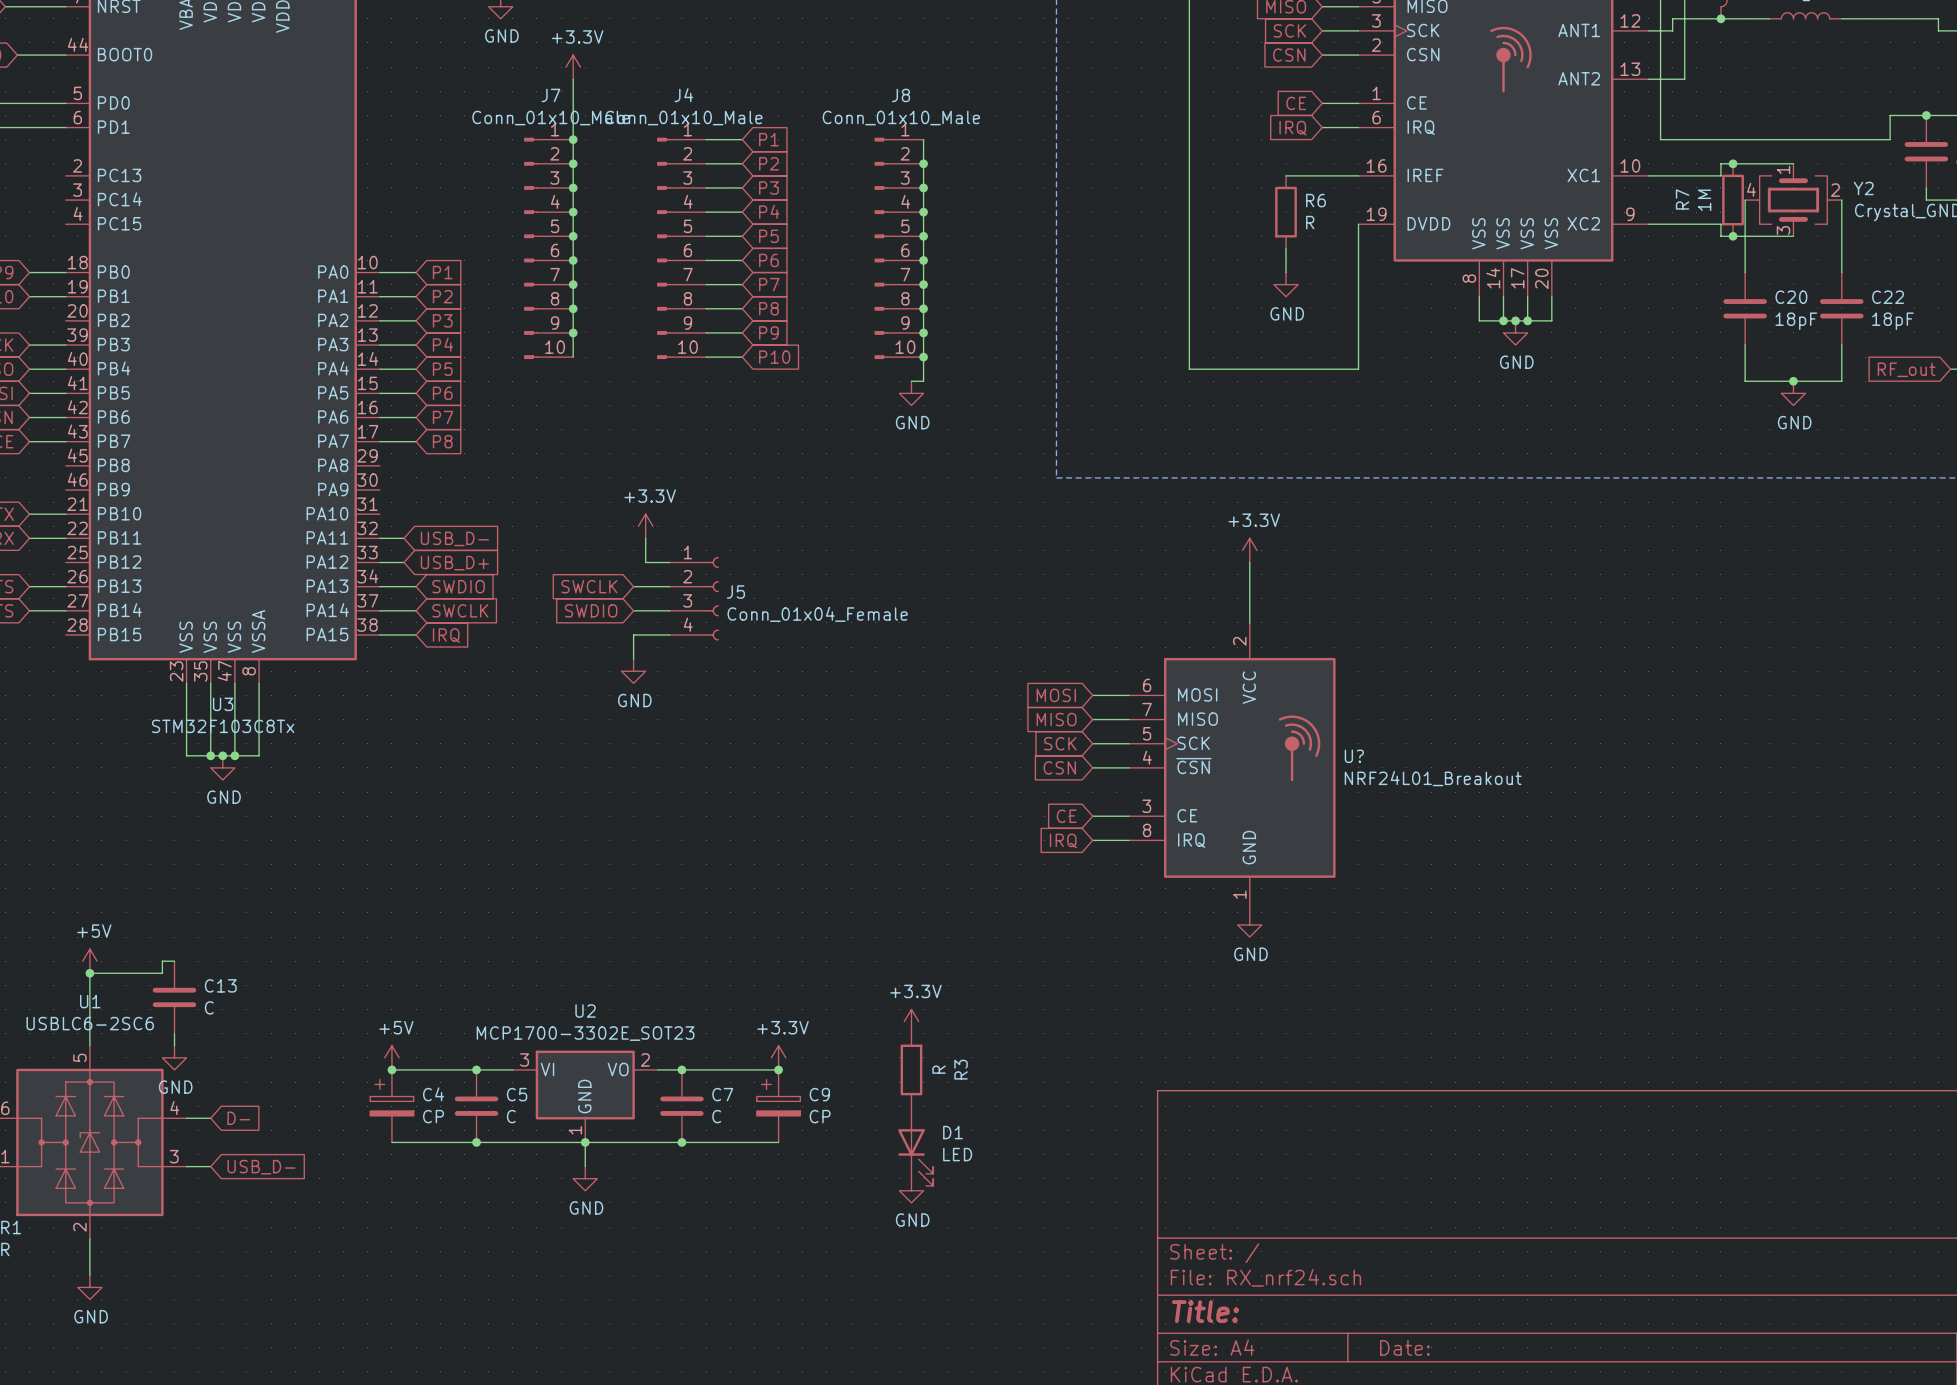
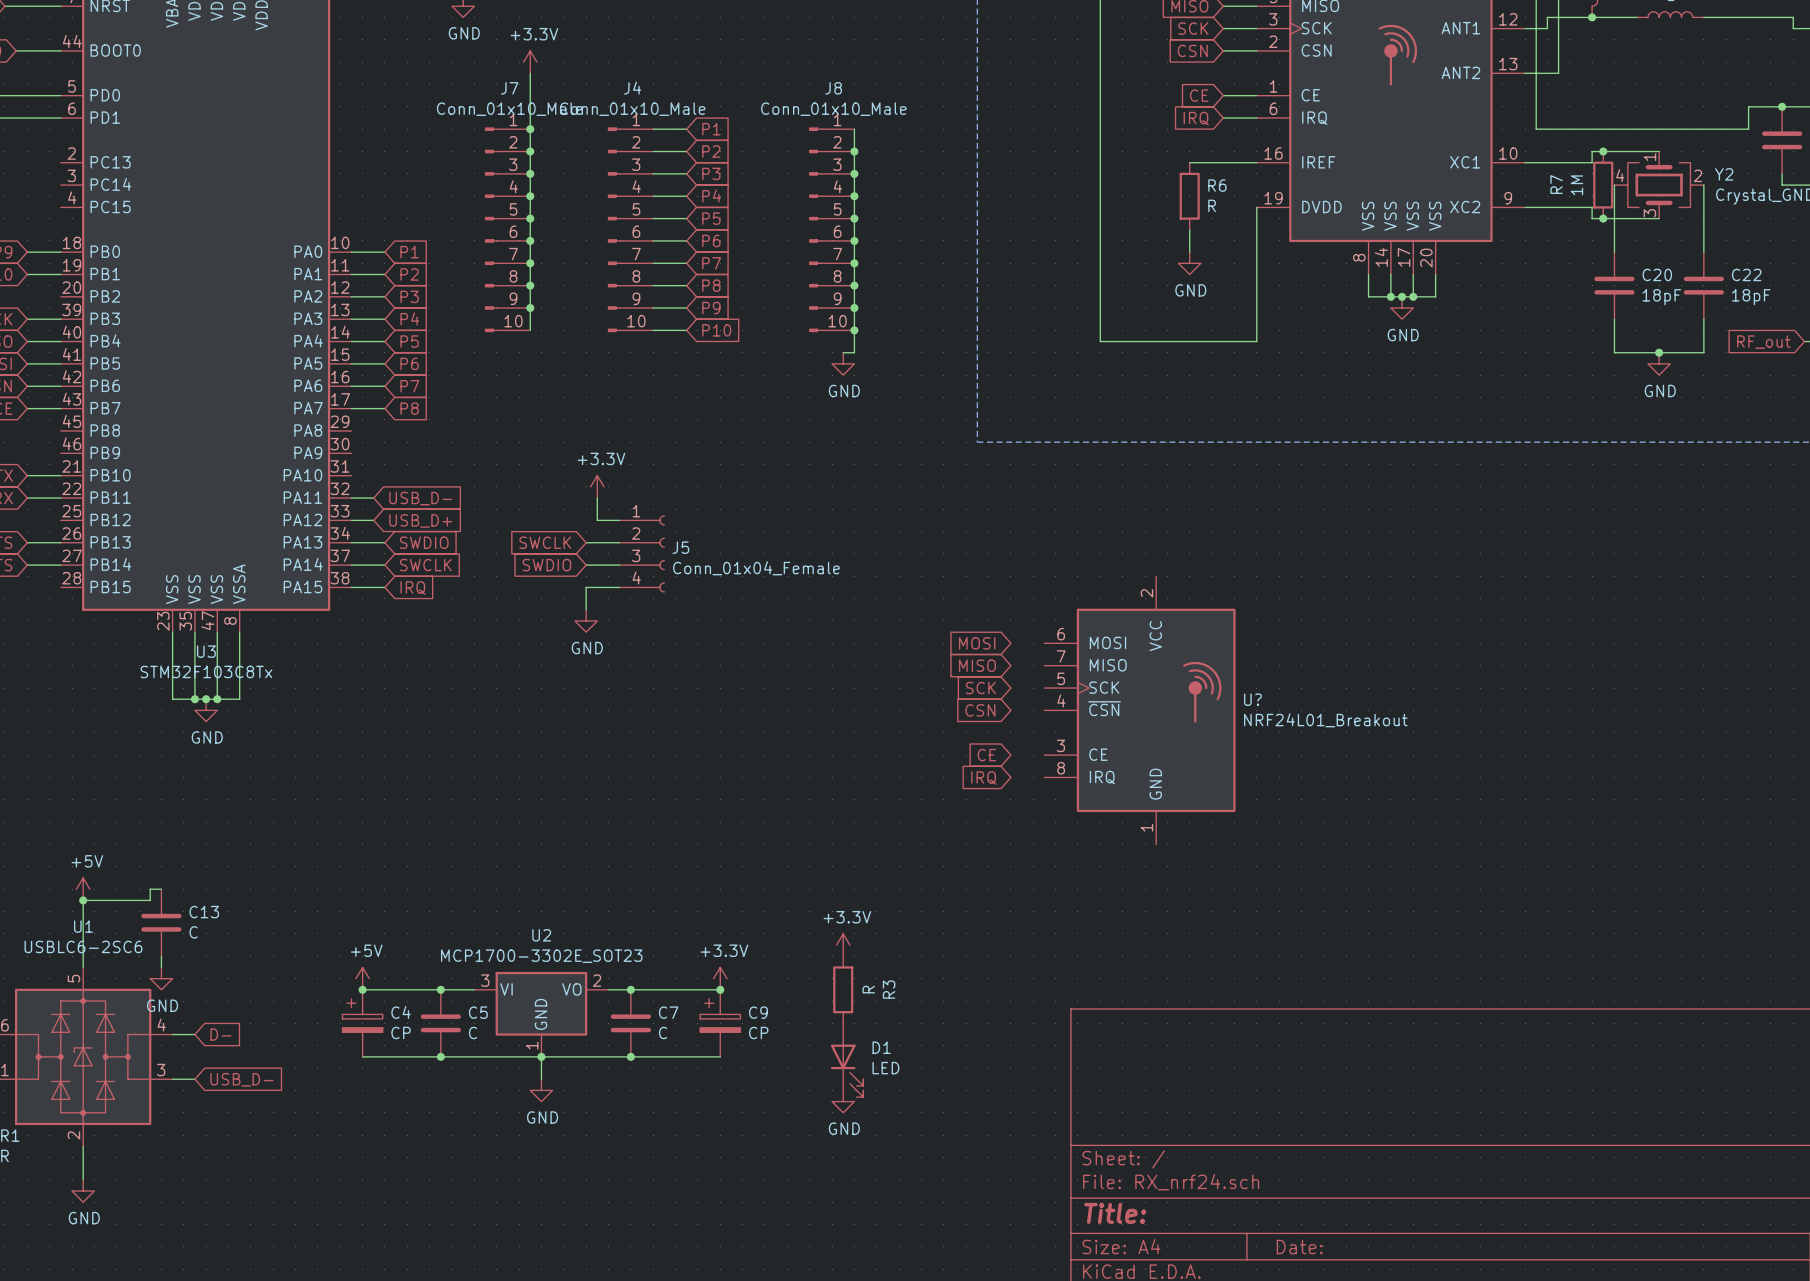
power symbol: +3.3V (1249, 550) -> none
wire: (1249, 562) (1249, 622) -> none
wire: (1092, 695) (1128, 695) -> none
wire: (1092, 719) (1128, 719) -> none
wire: (1092, 743) (1128, 743) -> none
wire: (1092, 767) (1128, 767) -> none
wire: (1092, 816) (1128, 816) -> none
wire: (1092, 840) (1128, 840) -> none
power symbol: GND (1249, 924) -> none

